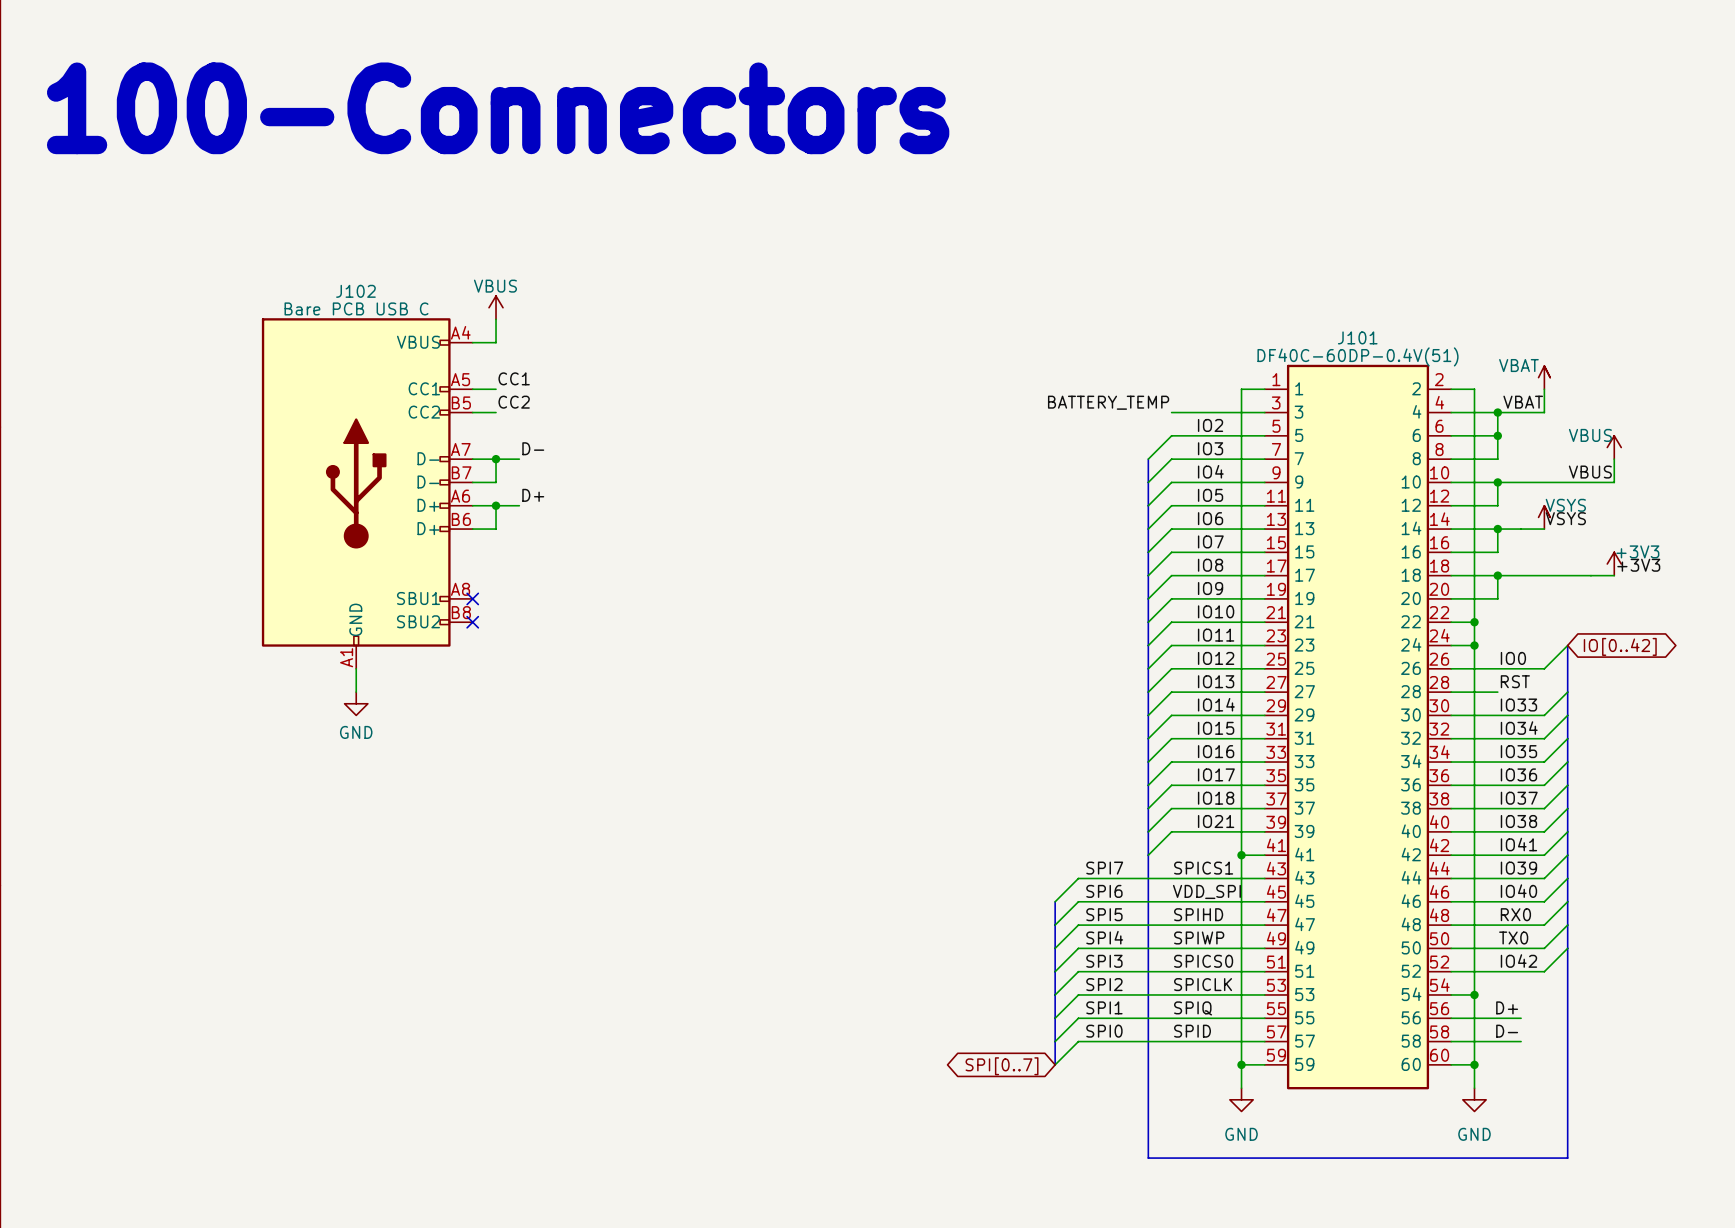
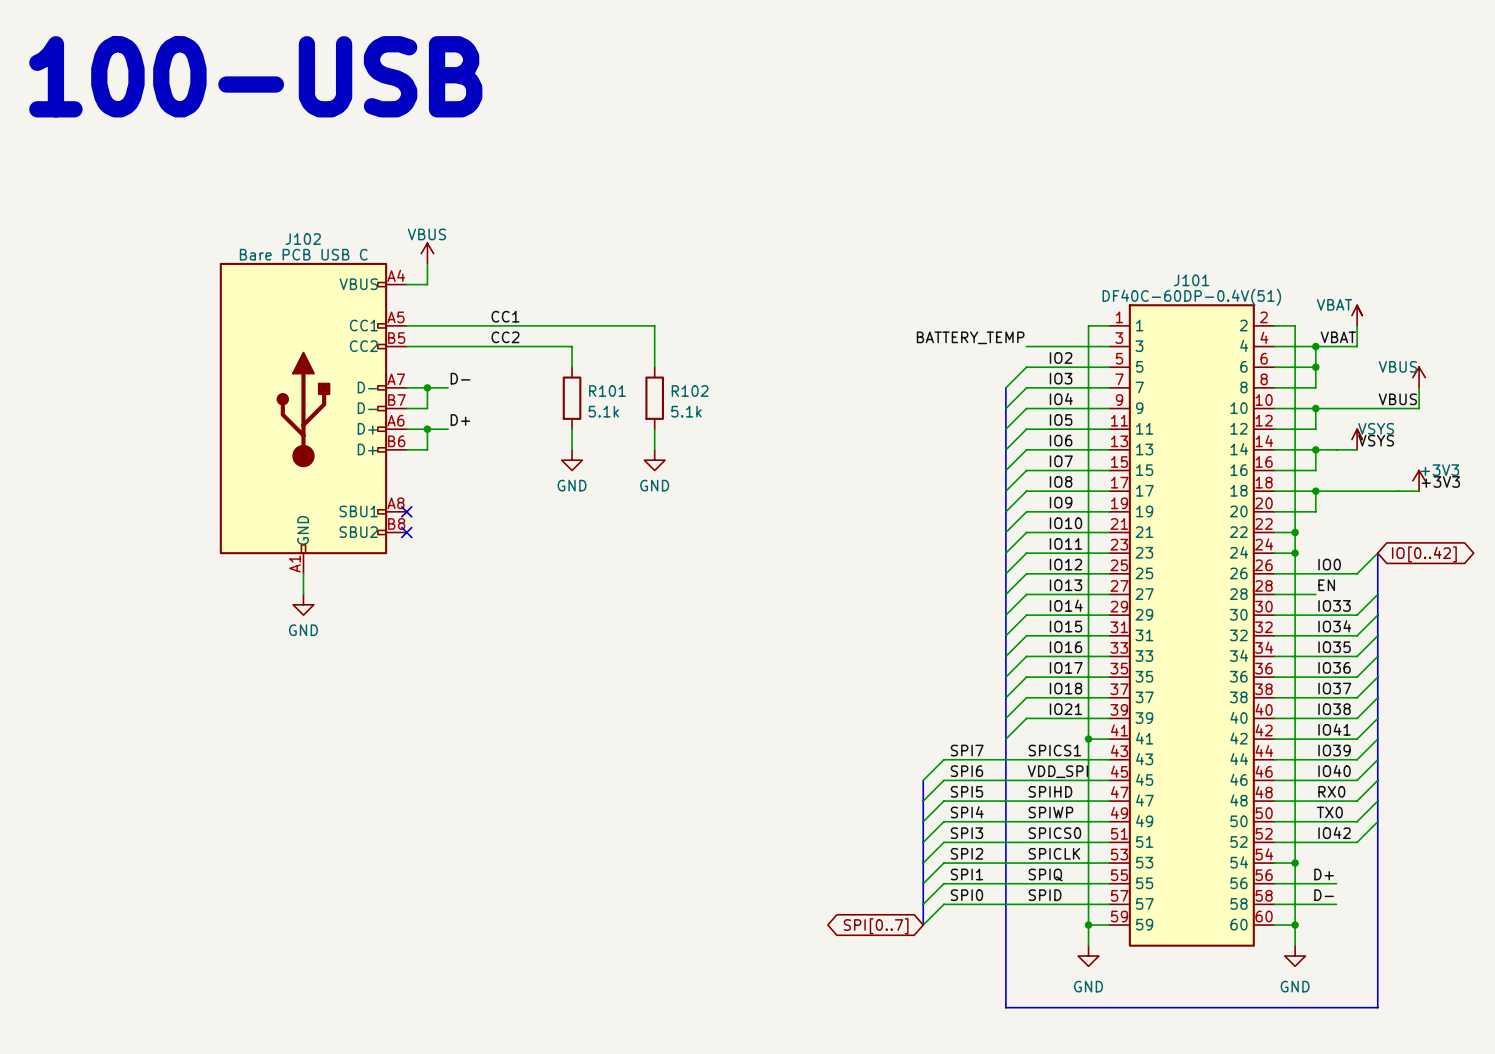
text: 100-Connectors (498, 108) -> 100-USB (255, 76)
label position: CC1 (514, 378) -> CC1 (505, 316)
wire: none -> (427, 325) (654, 325) (654, 367)
label position: CC2 (514, 402) -> CC2 (505, 337)
wire: none -> (427, 346) (572, 346) (572, 367)
R101: none -> 5.1k (572, 398)
R102: none -> 5.1k (654, 398)
wire: none -> (572, 429) (572, 449)
wire: none -> (654, 429) (654, 449)
power symbol: none -> GND (572, 460)
power symbol: none -> GND (654, 460)
label: RST (1515, 681) -> EN (1326, 585)

